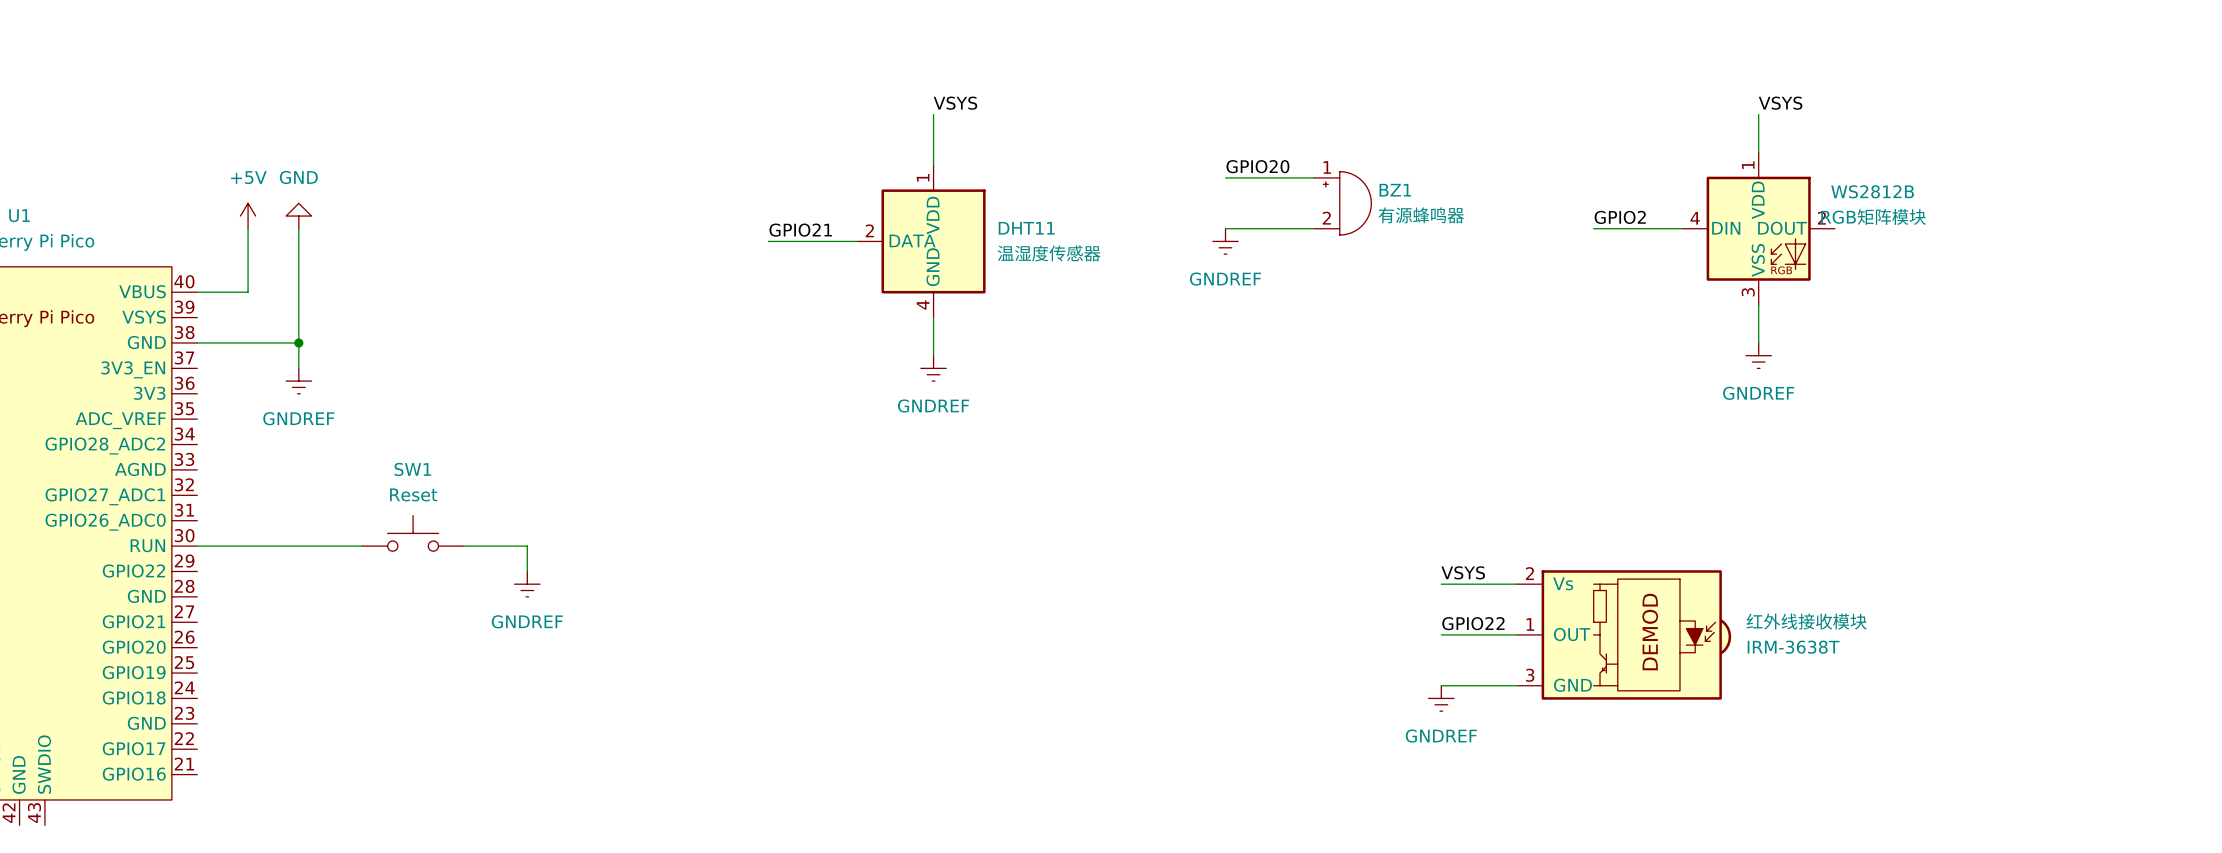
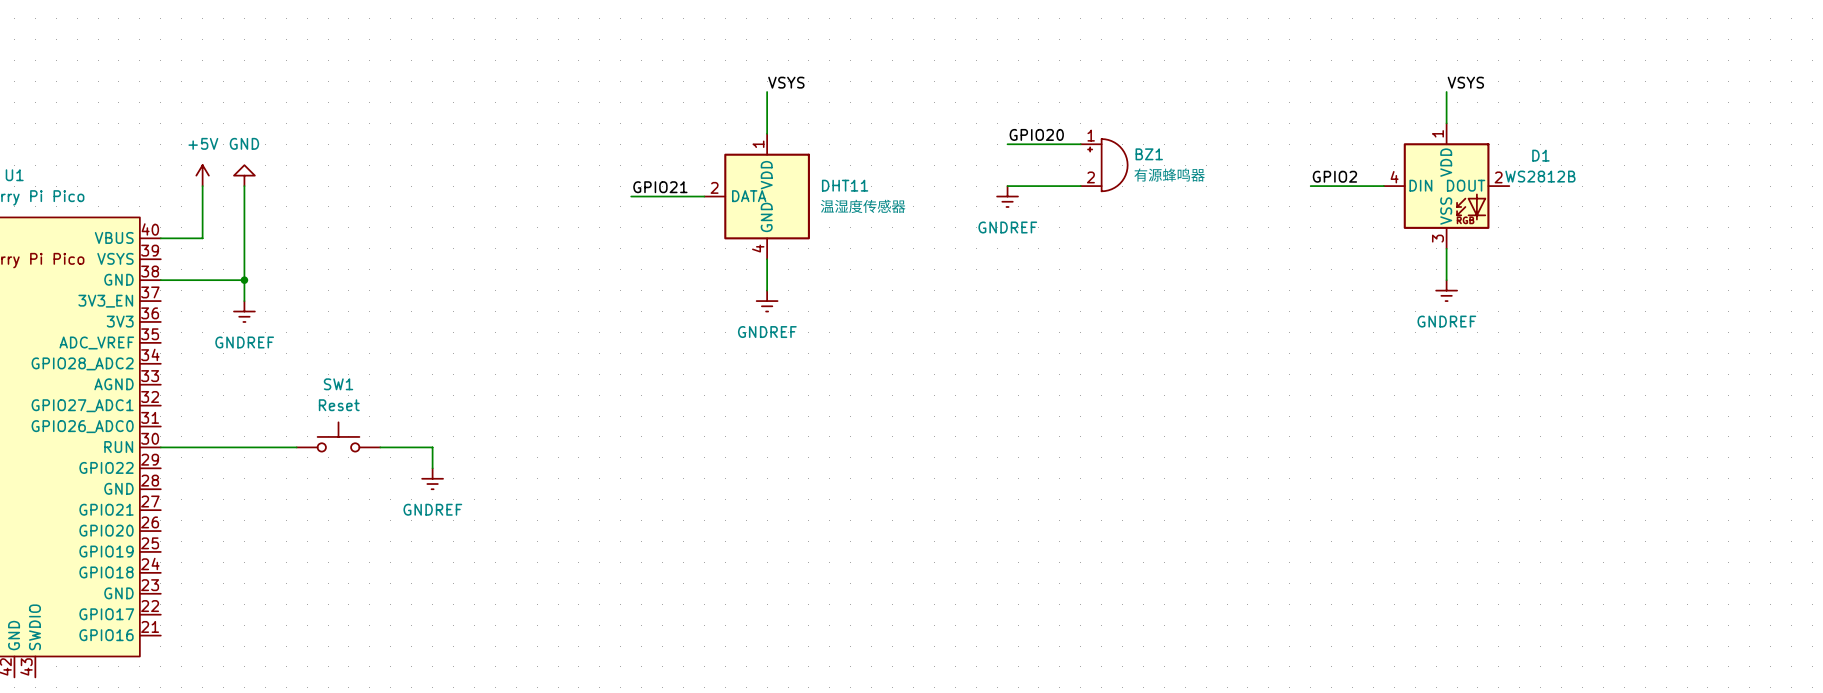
WS2812B name: WS2812B (1872, 191) -> D1 (1540, 155)
WS2812B value: RGB矩阵模块 (1873, 216) -> WS2812B (1540, 176)
label: VSYS (1463, 572) -> none
wire: (1441, 584) (1517, 584) -> none
label: GPIO22 (1473, 623) -> none
wire: (1441, 634) (1517, 634) -> none
IRM-3638T: 红外线接收模块 (1624, 634) -> none
wire: (1441, 685) (1517, 685) -> none
power symbol: GNDREF (1441, 698) -> none

